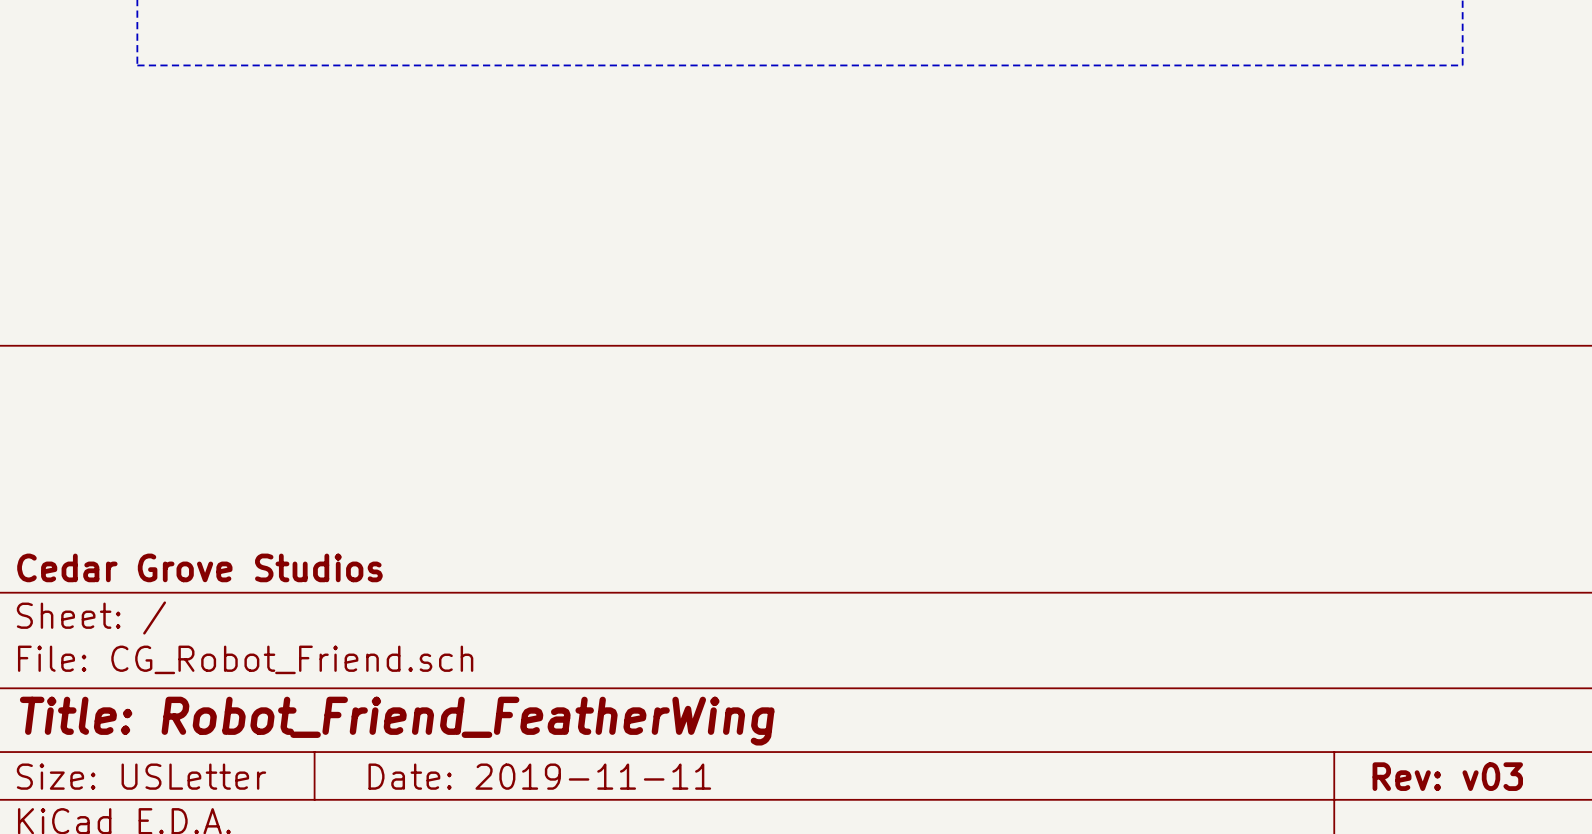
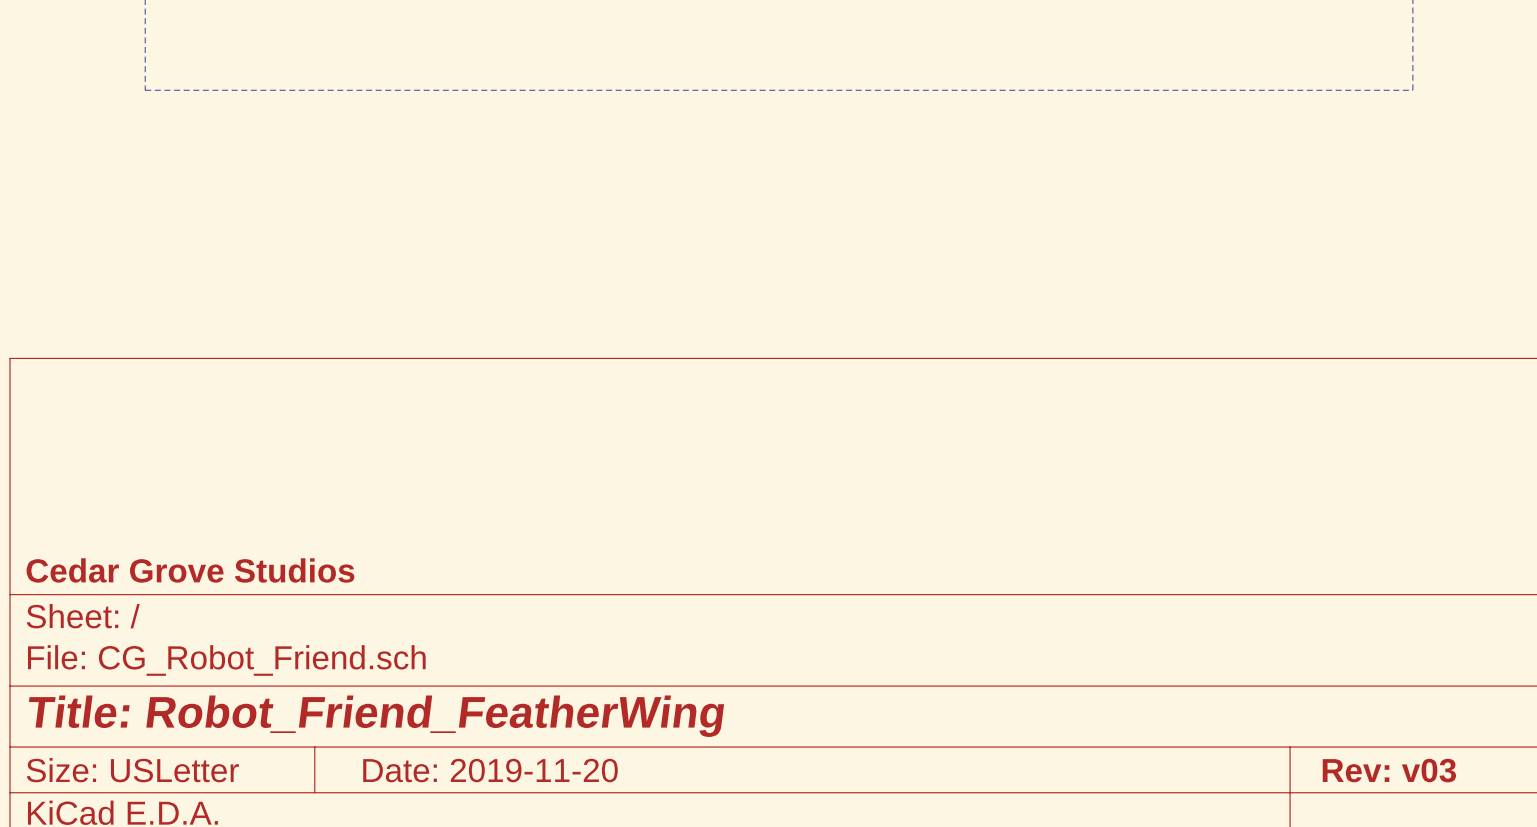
title block: Date: 2019-11-11 (539, 776) -> Date: 2019-11-20 (490, 770)

